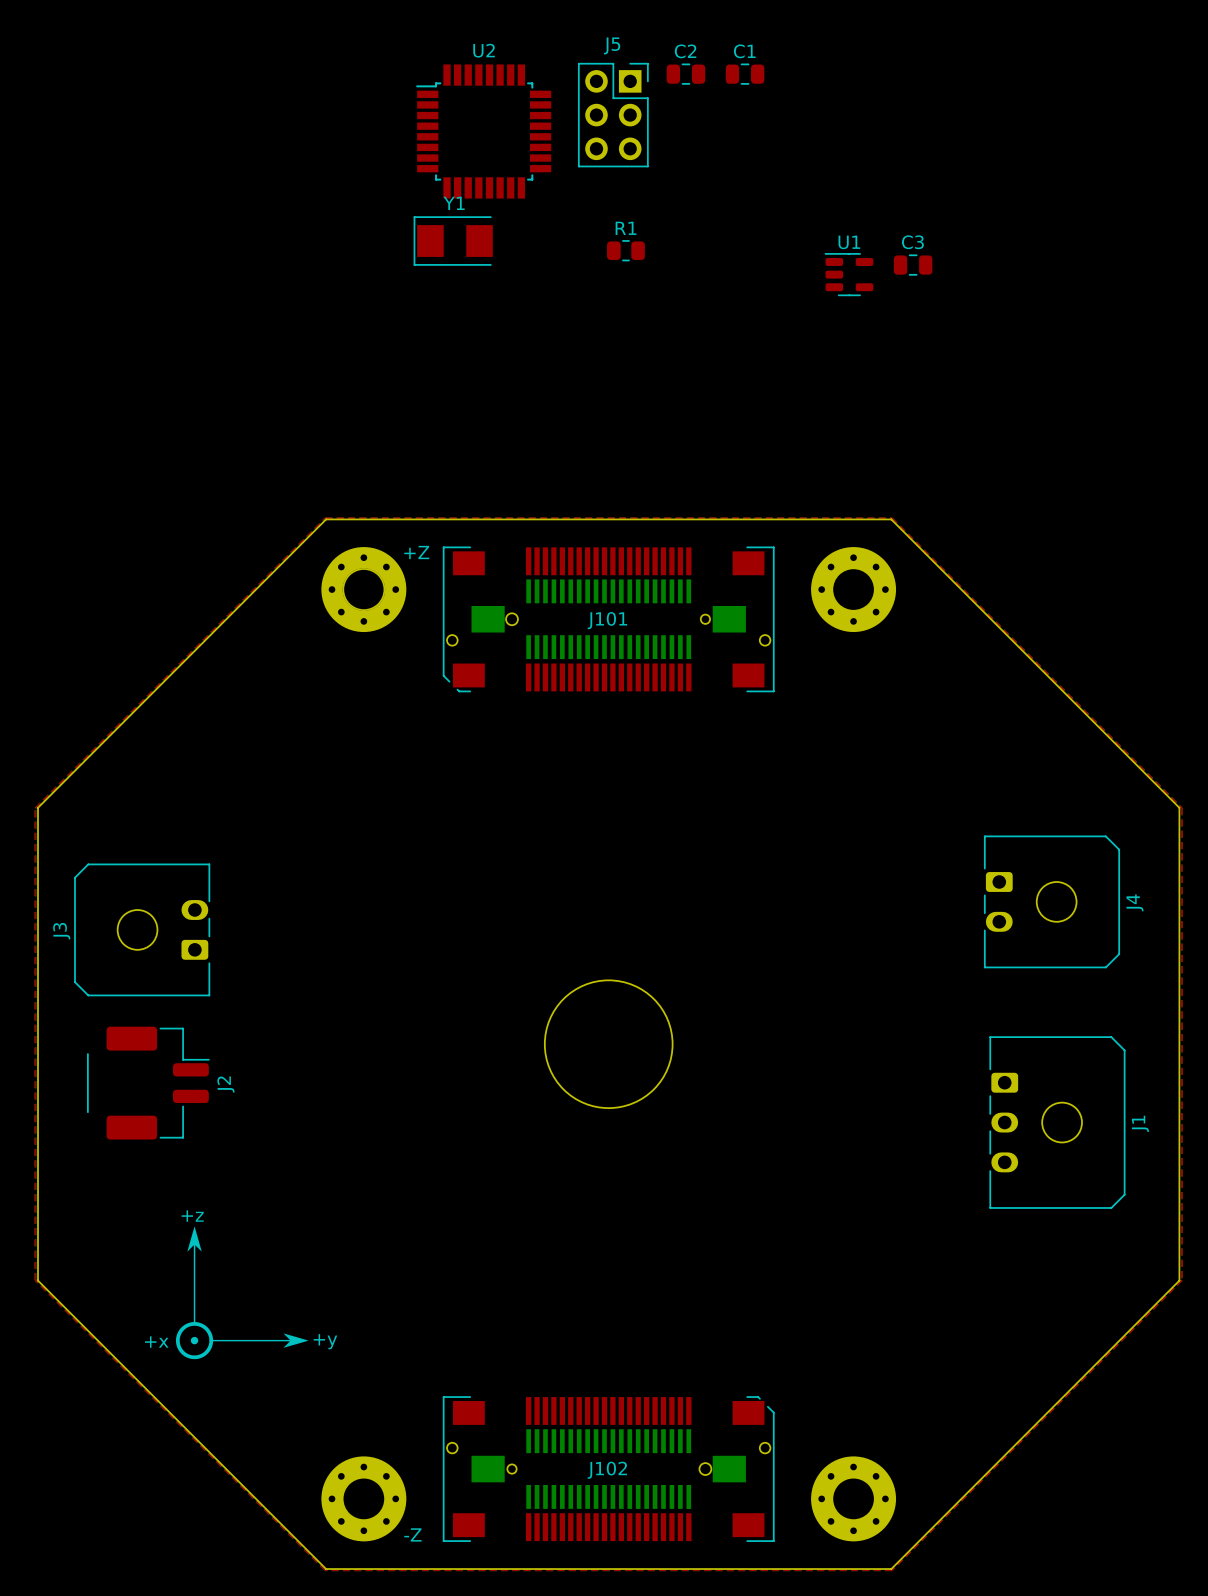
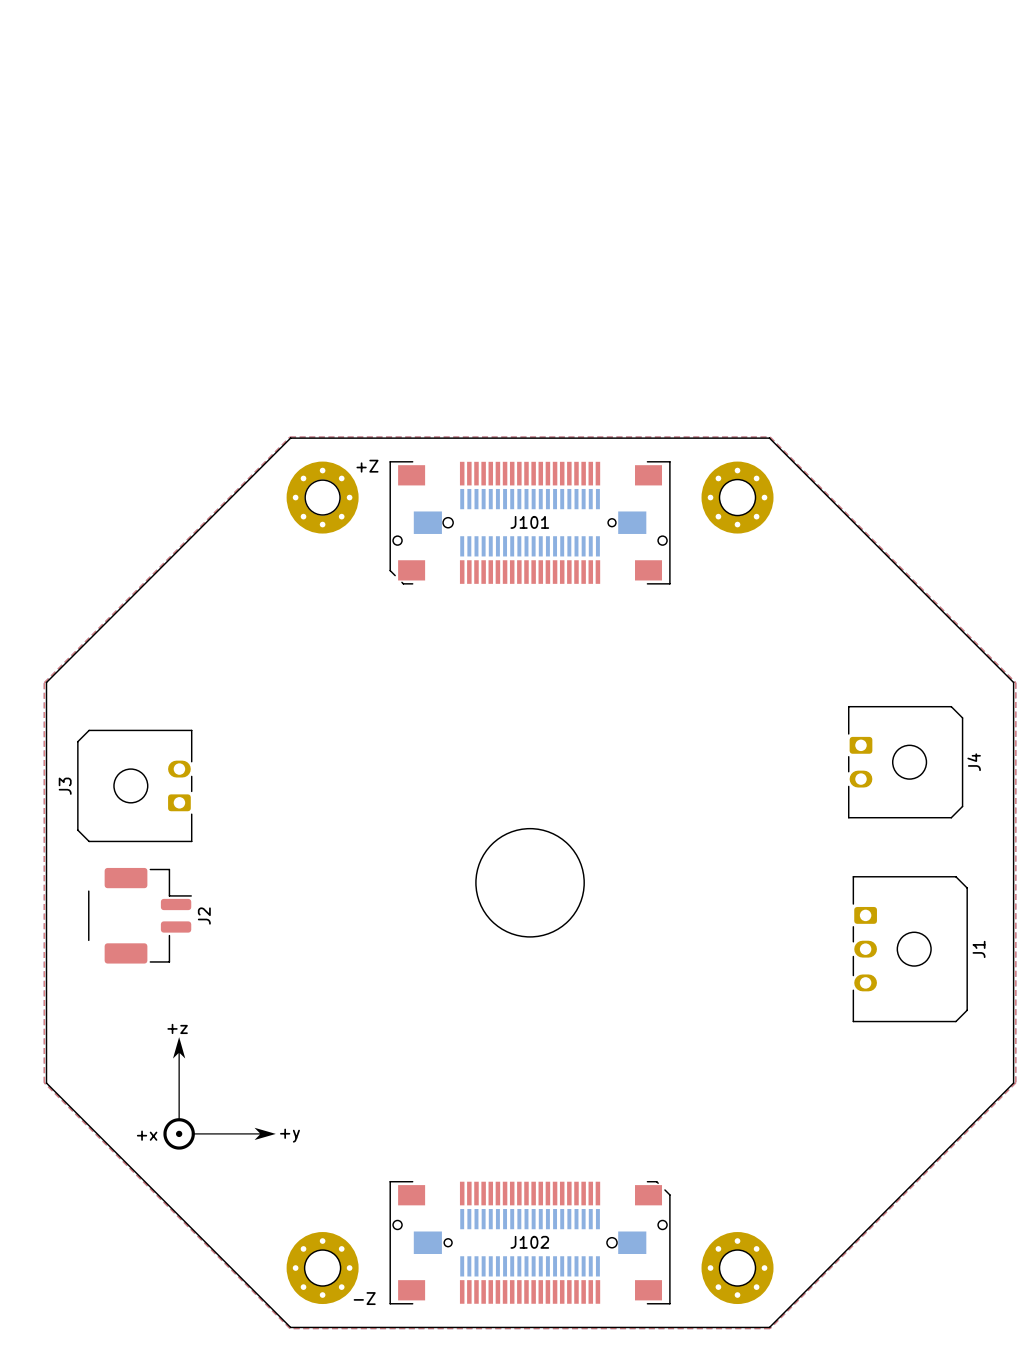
C2: (685, 74) -> none
C1: (745, 74) -> none
J5: (613, 115) -> none
U2: (483, 131) -> none
Y1: (453, 241) -> none
R1: (625, 250) -> none
C3: (913, 265) -> none
U1: (849, 274) -> none

